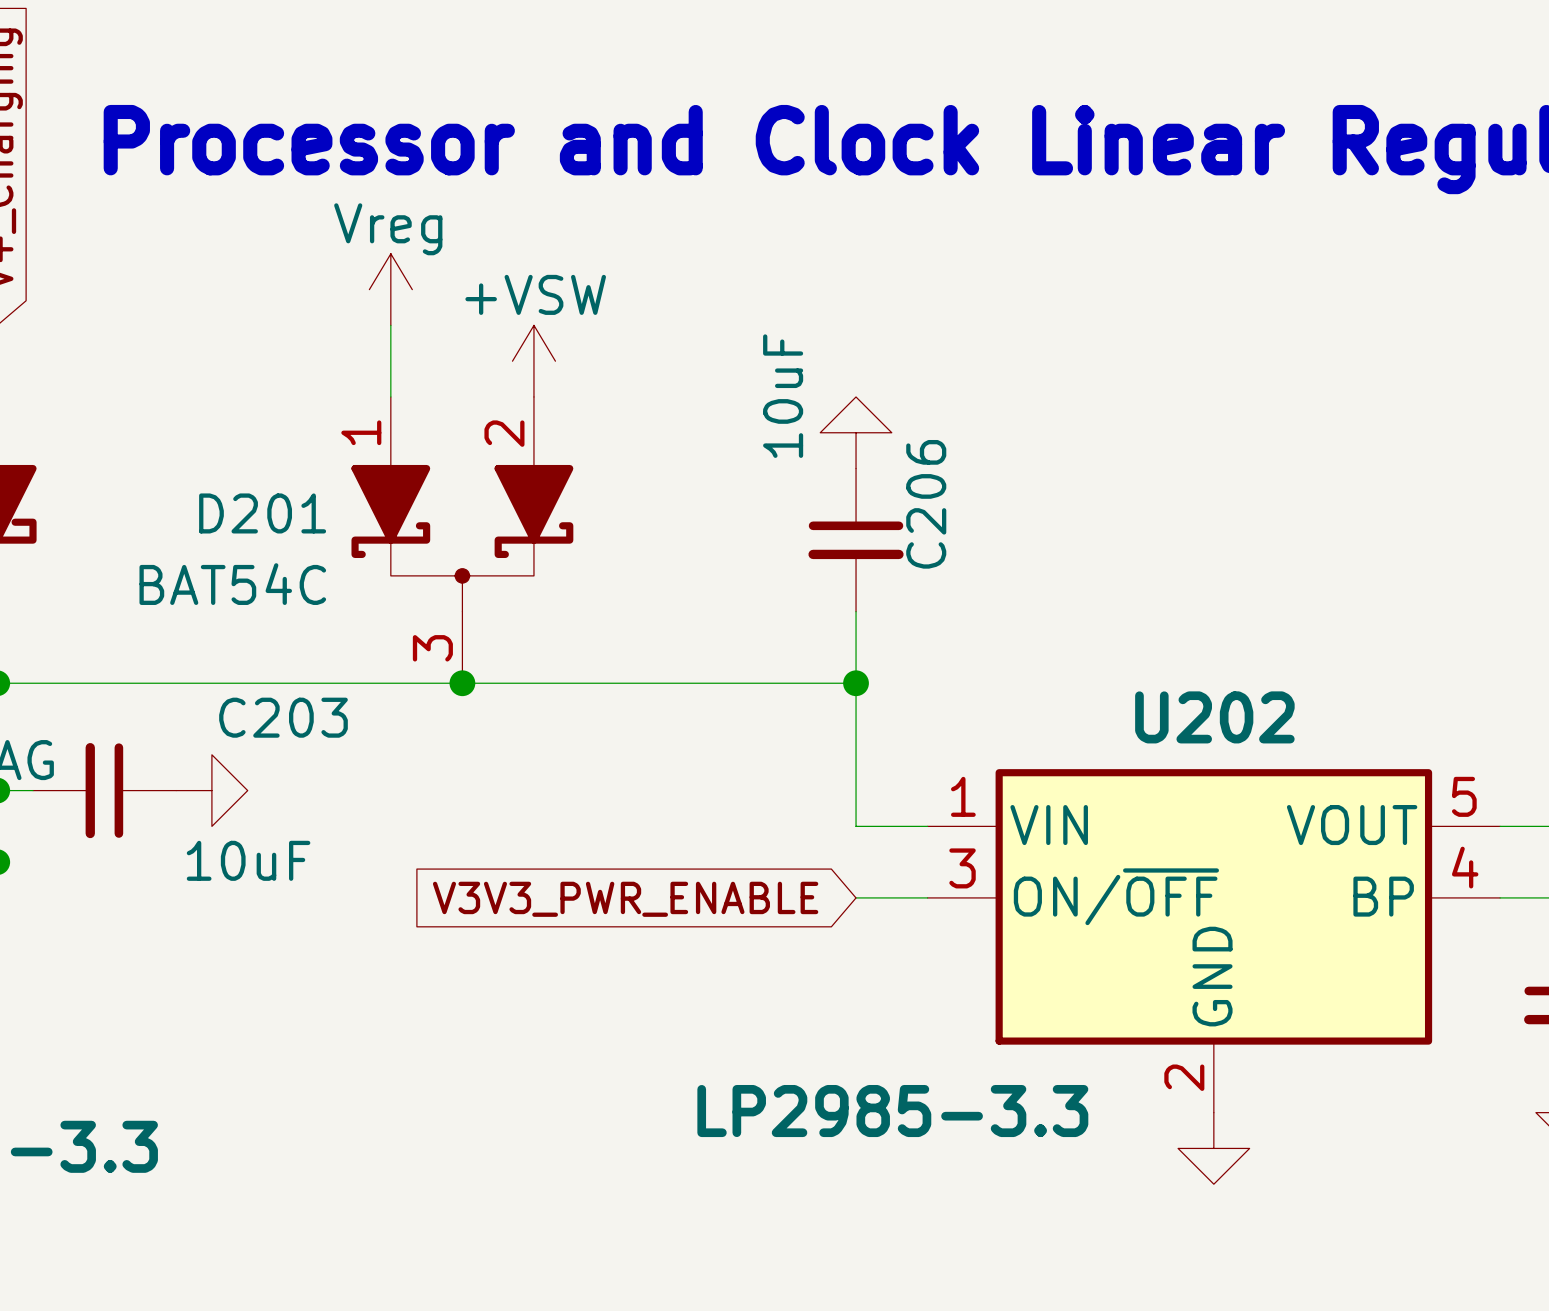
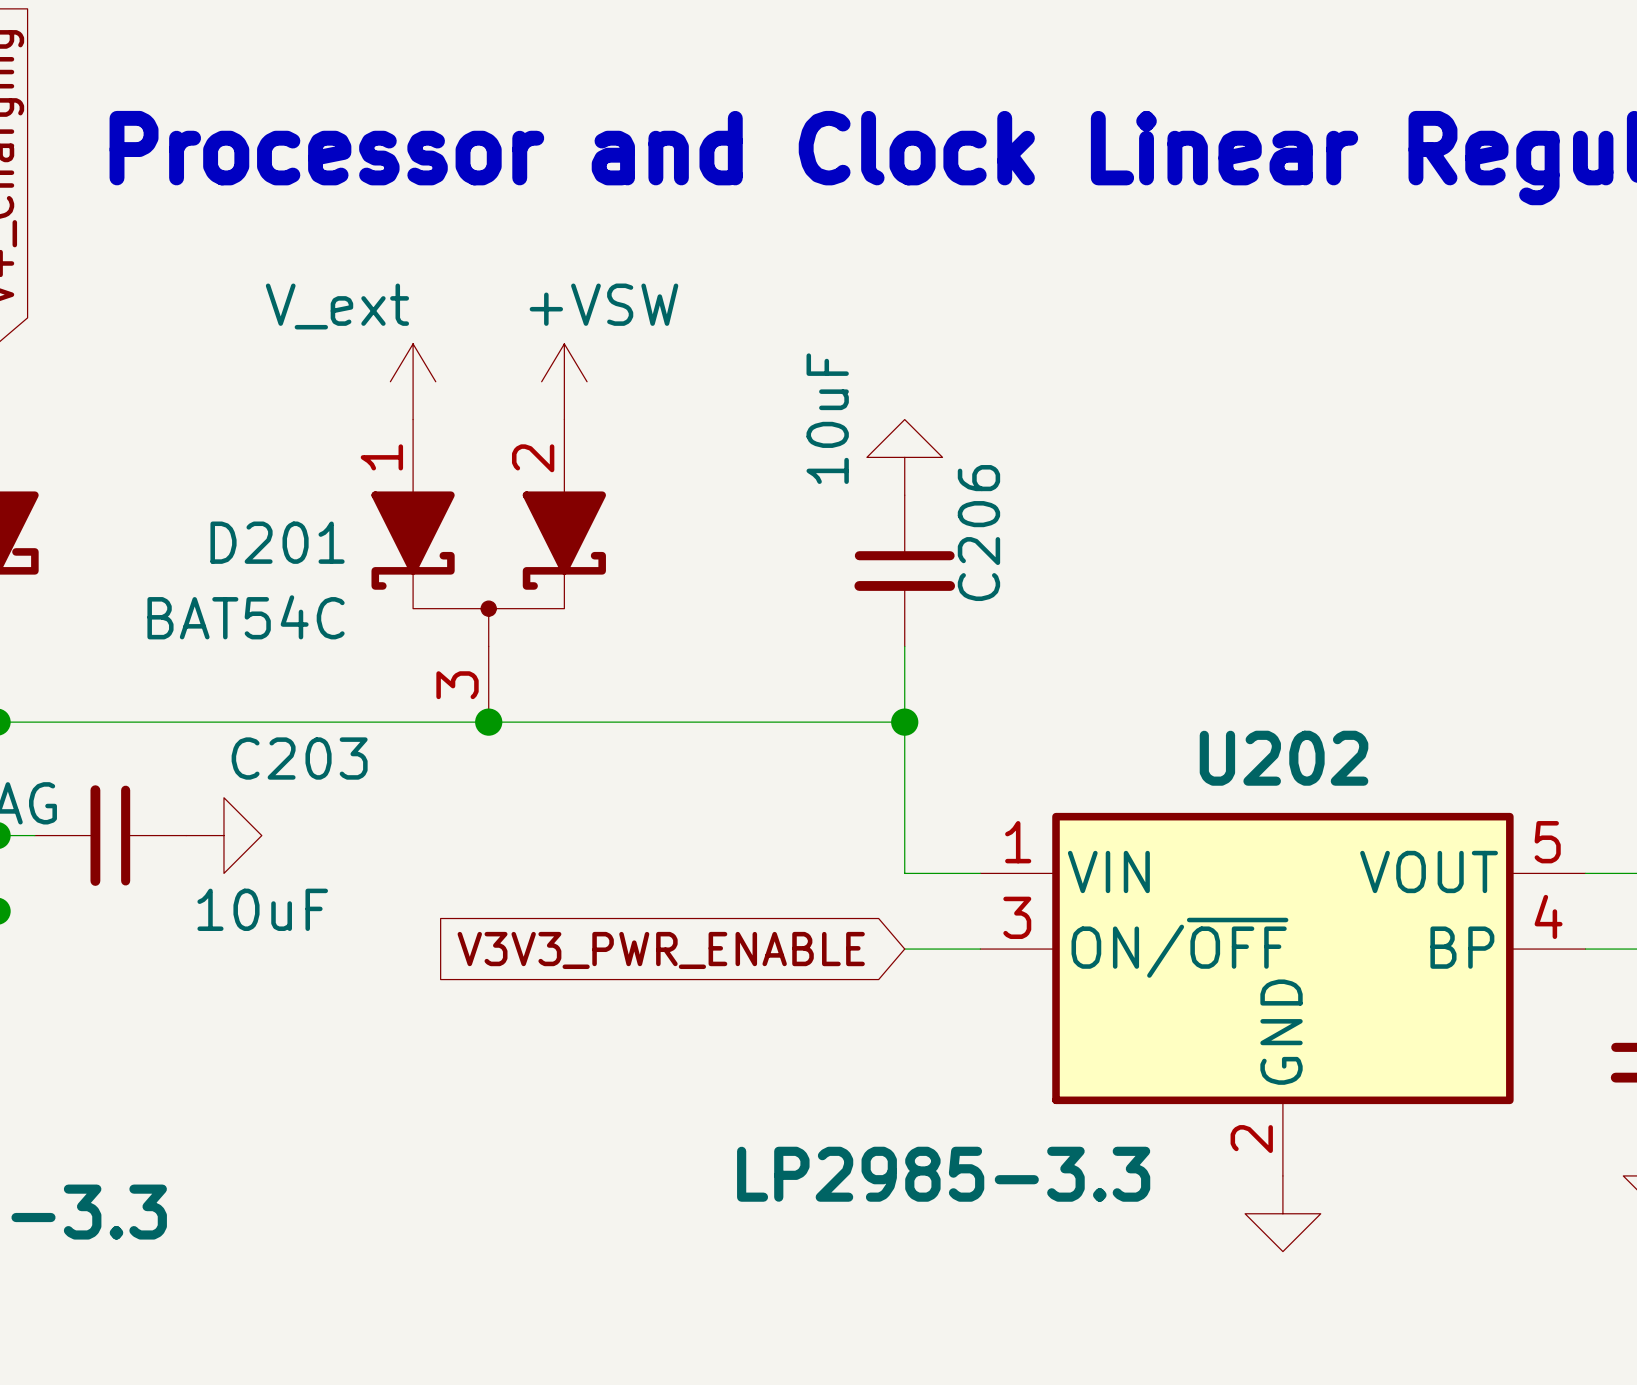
power symbol: Vreg (390, 289) -> none
power symbol text position: +VSW (535, 294) -> +VSW (603, 304)
power symbol: none -> V_ext (413, 381)

